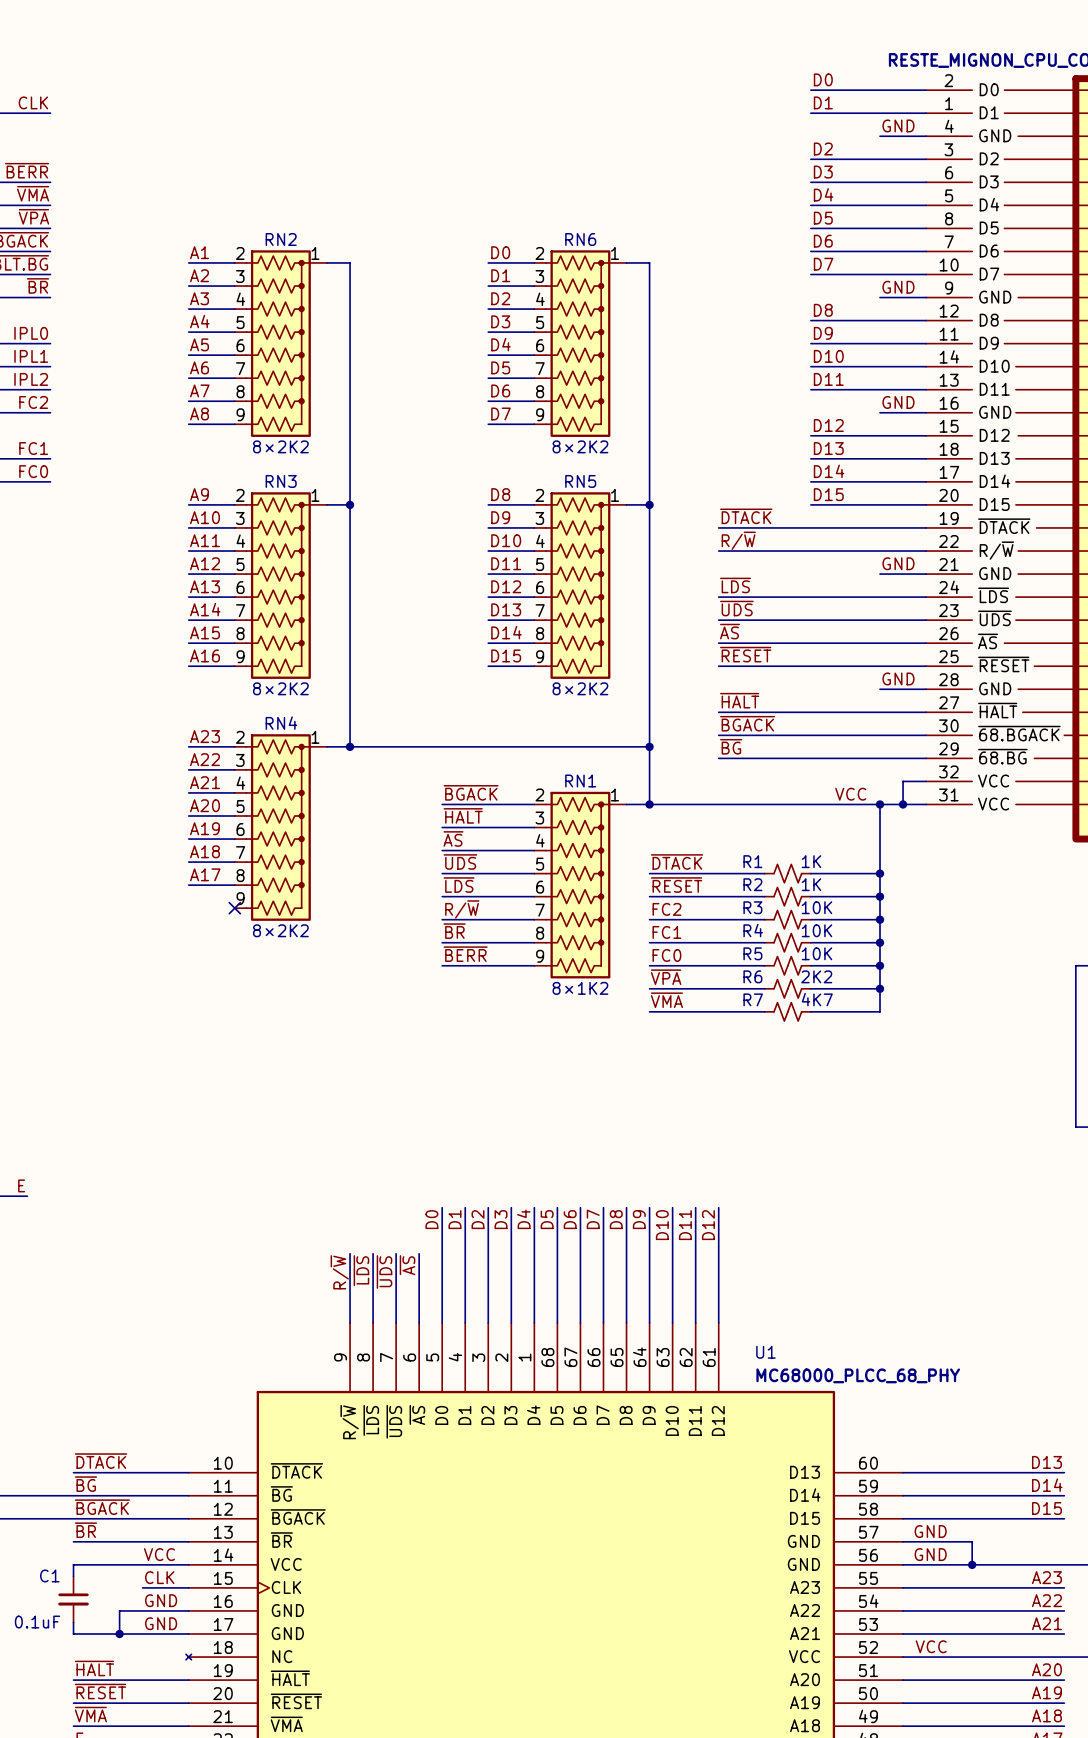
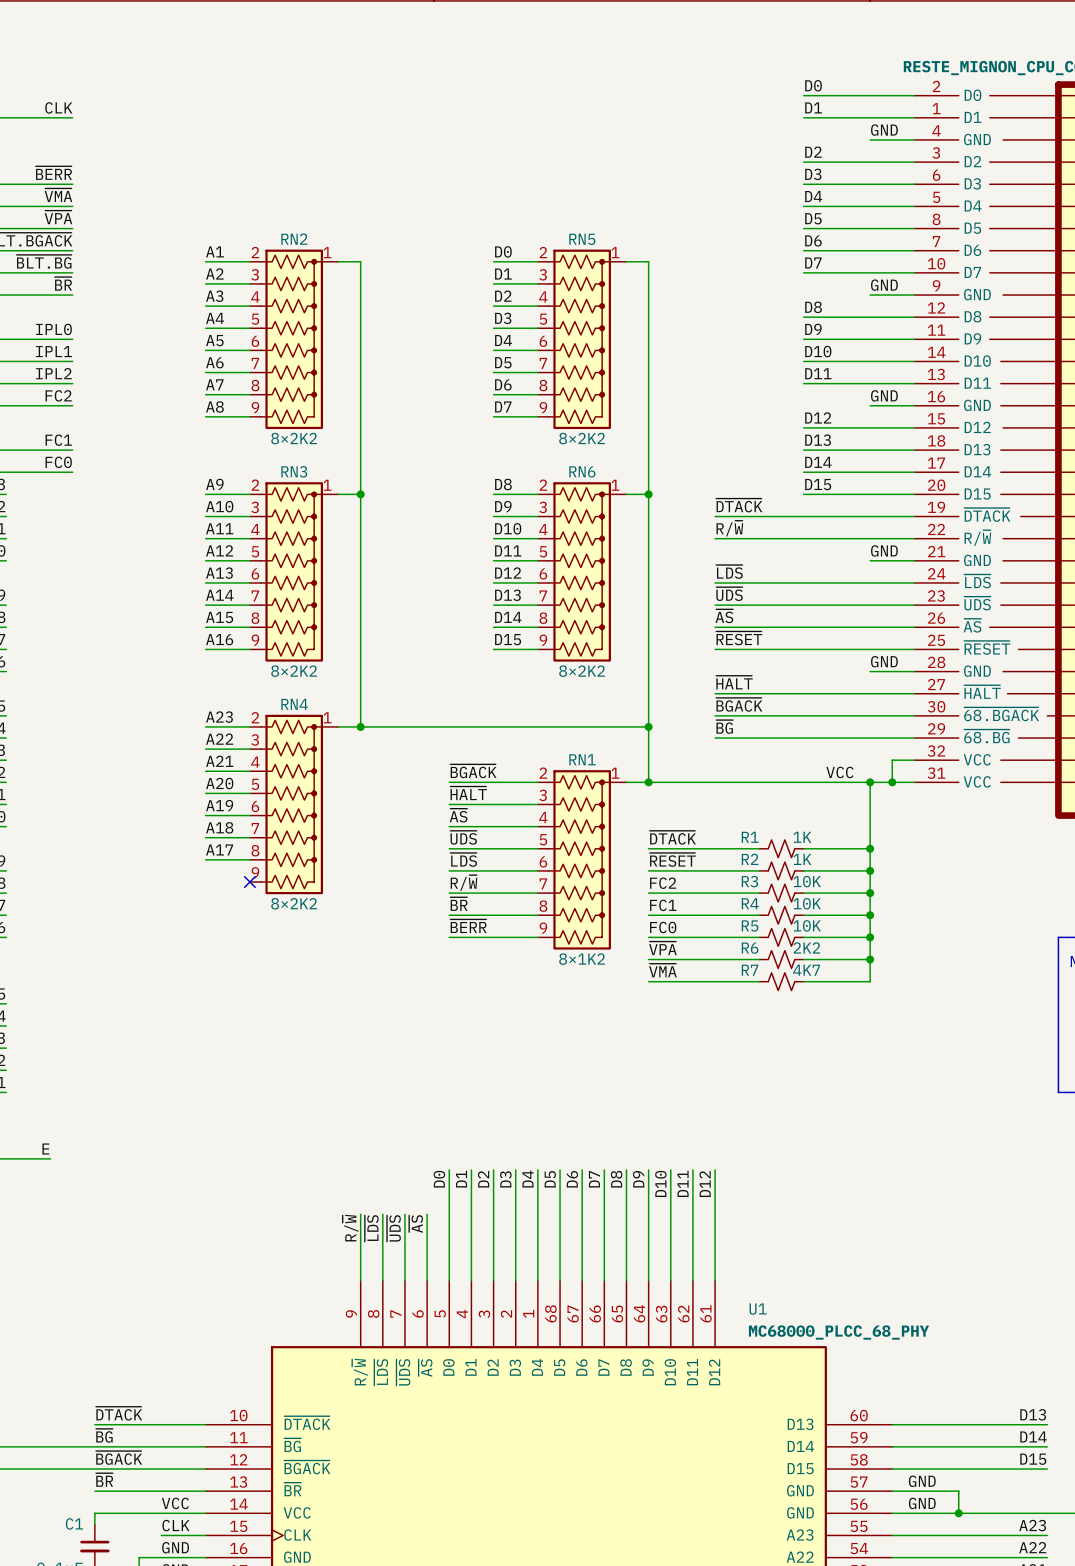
RN6 name: RN6 (580, 239) -> RN5 (582, 239)
RN5 name: RN5 (580, 481) -> RN6 (582, 471)

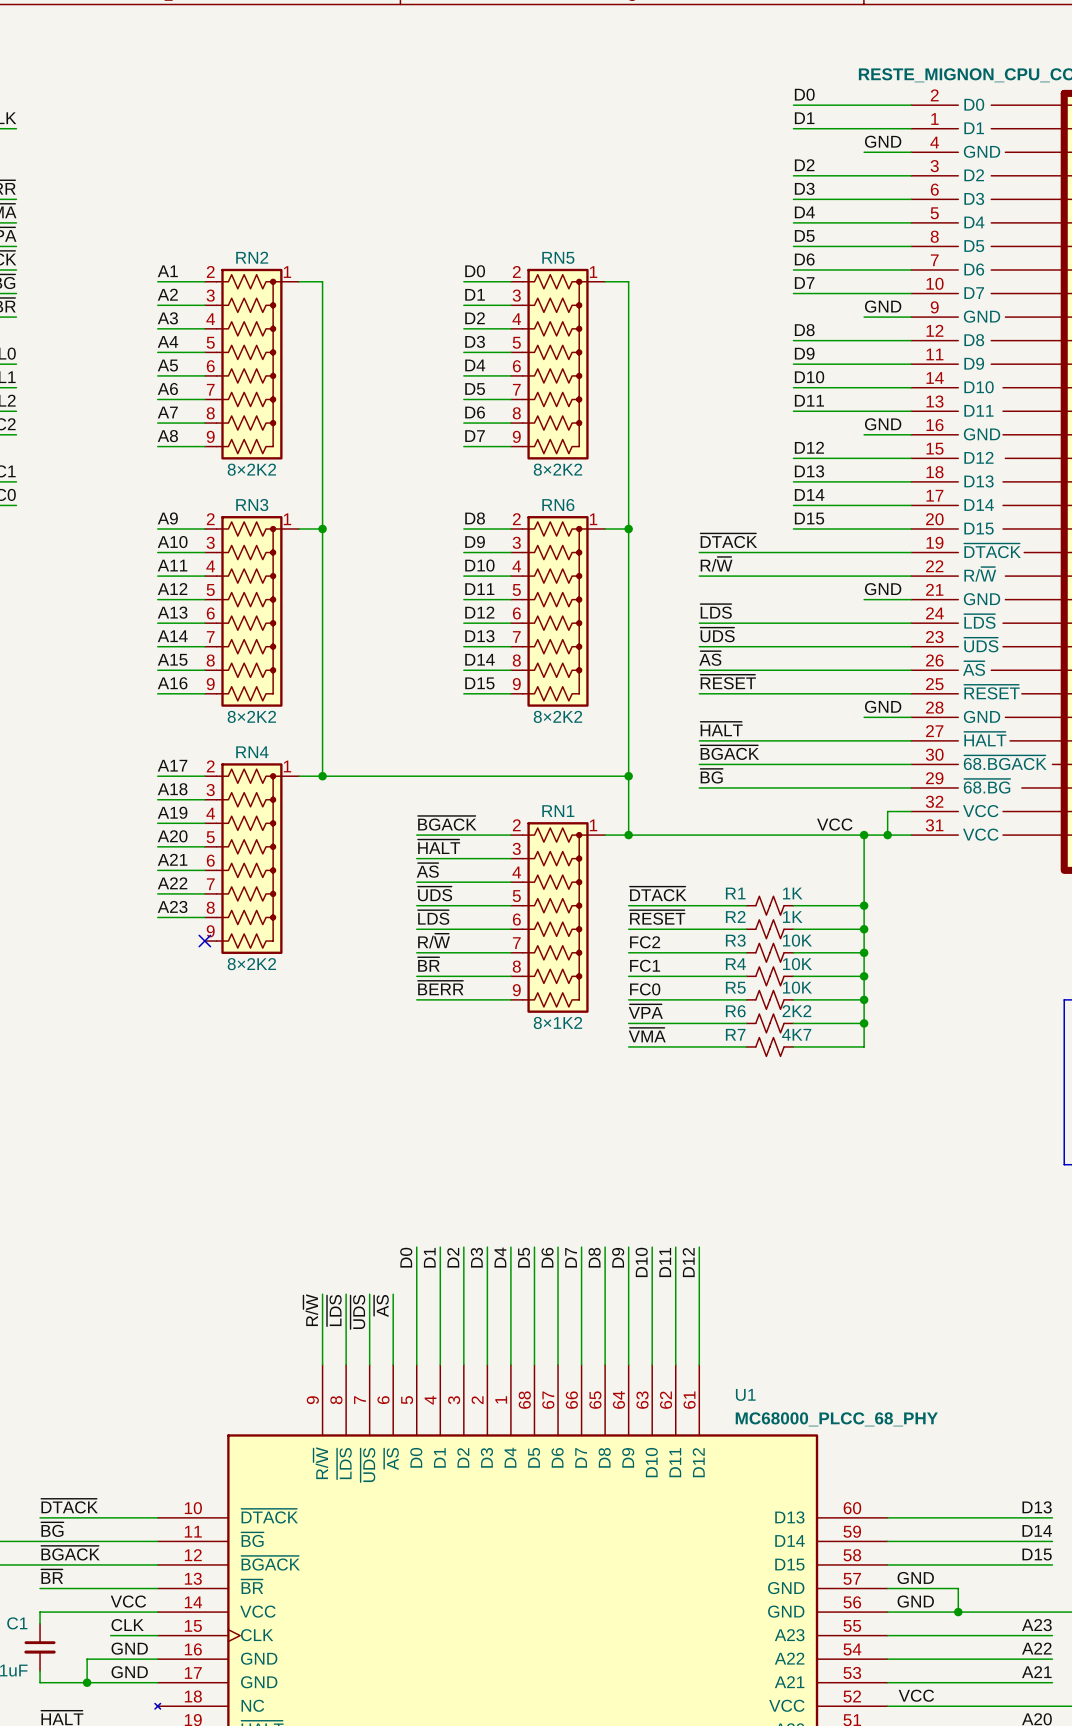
label: A23 (219, 717) -> A17 (172, 765)
label: A22 (219, 739) -> A18 (172, 789)
label: A21 (219, 761) -> A19 (172, 812)
label: A19 (219, 805) -> A21 (172, 859)
label: A18 (219, 827) -> A22 (172, 883)
label: A17 (219, 849) -> A23 (172, 906)

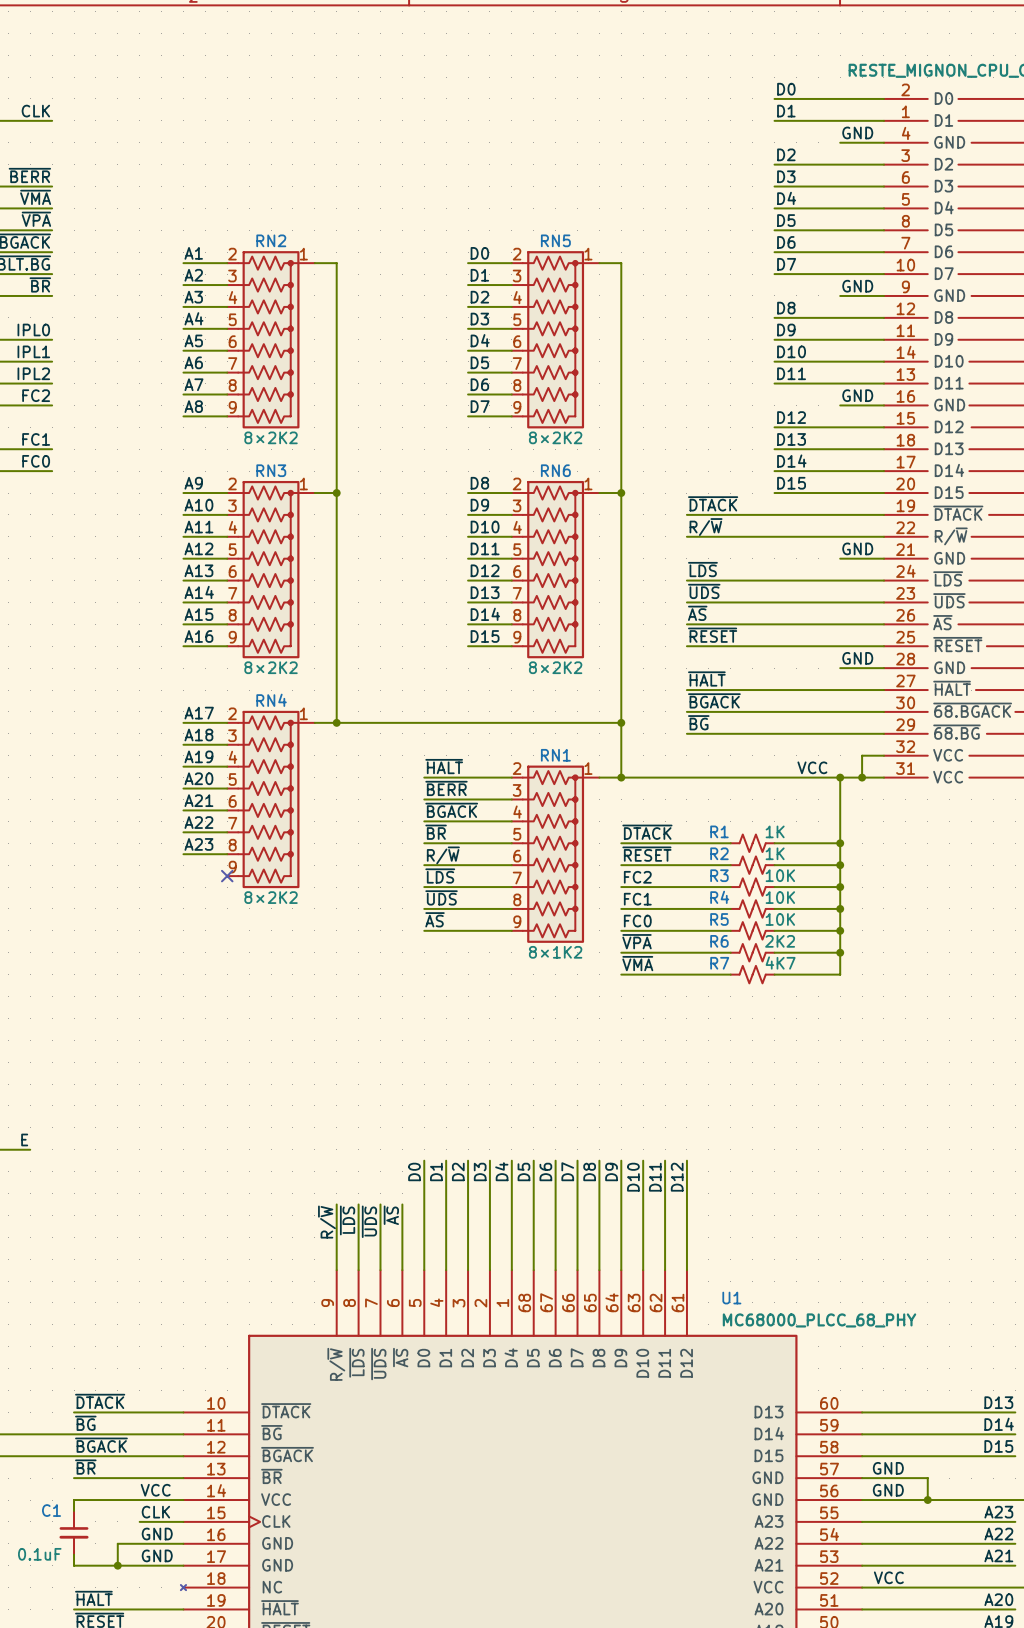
label: ~{BGACK} (447, 823) -> ~{HALT} (444, 766)
label: ~{HALT} (439, 846) -> ~{BERR} (446, 788)
label: ~{AS} (427, 870) -> ~{BGACK} (451, 810)
label: ~{UDS} (435, 893) -> ~{BR} (436, 832)
label: ~{LDS} (433, 917) -> R/~{W} (443, 855)
label: R/~{W} (434, 941) -> ~{LDS} (440, 876)
label: ~{BR} (428, 964) -> ~{UDS} (441, 897)
label: ~{BERR} (440, 988) -> ~{AS} (435, 919)

